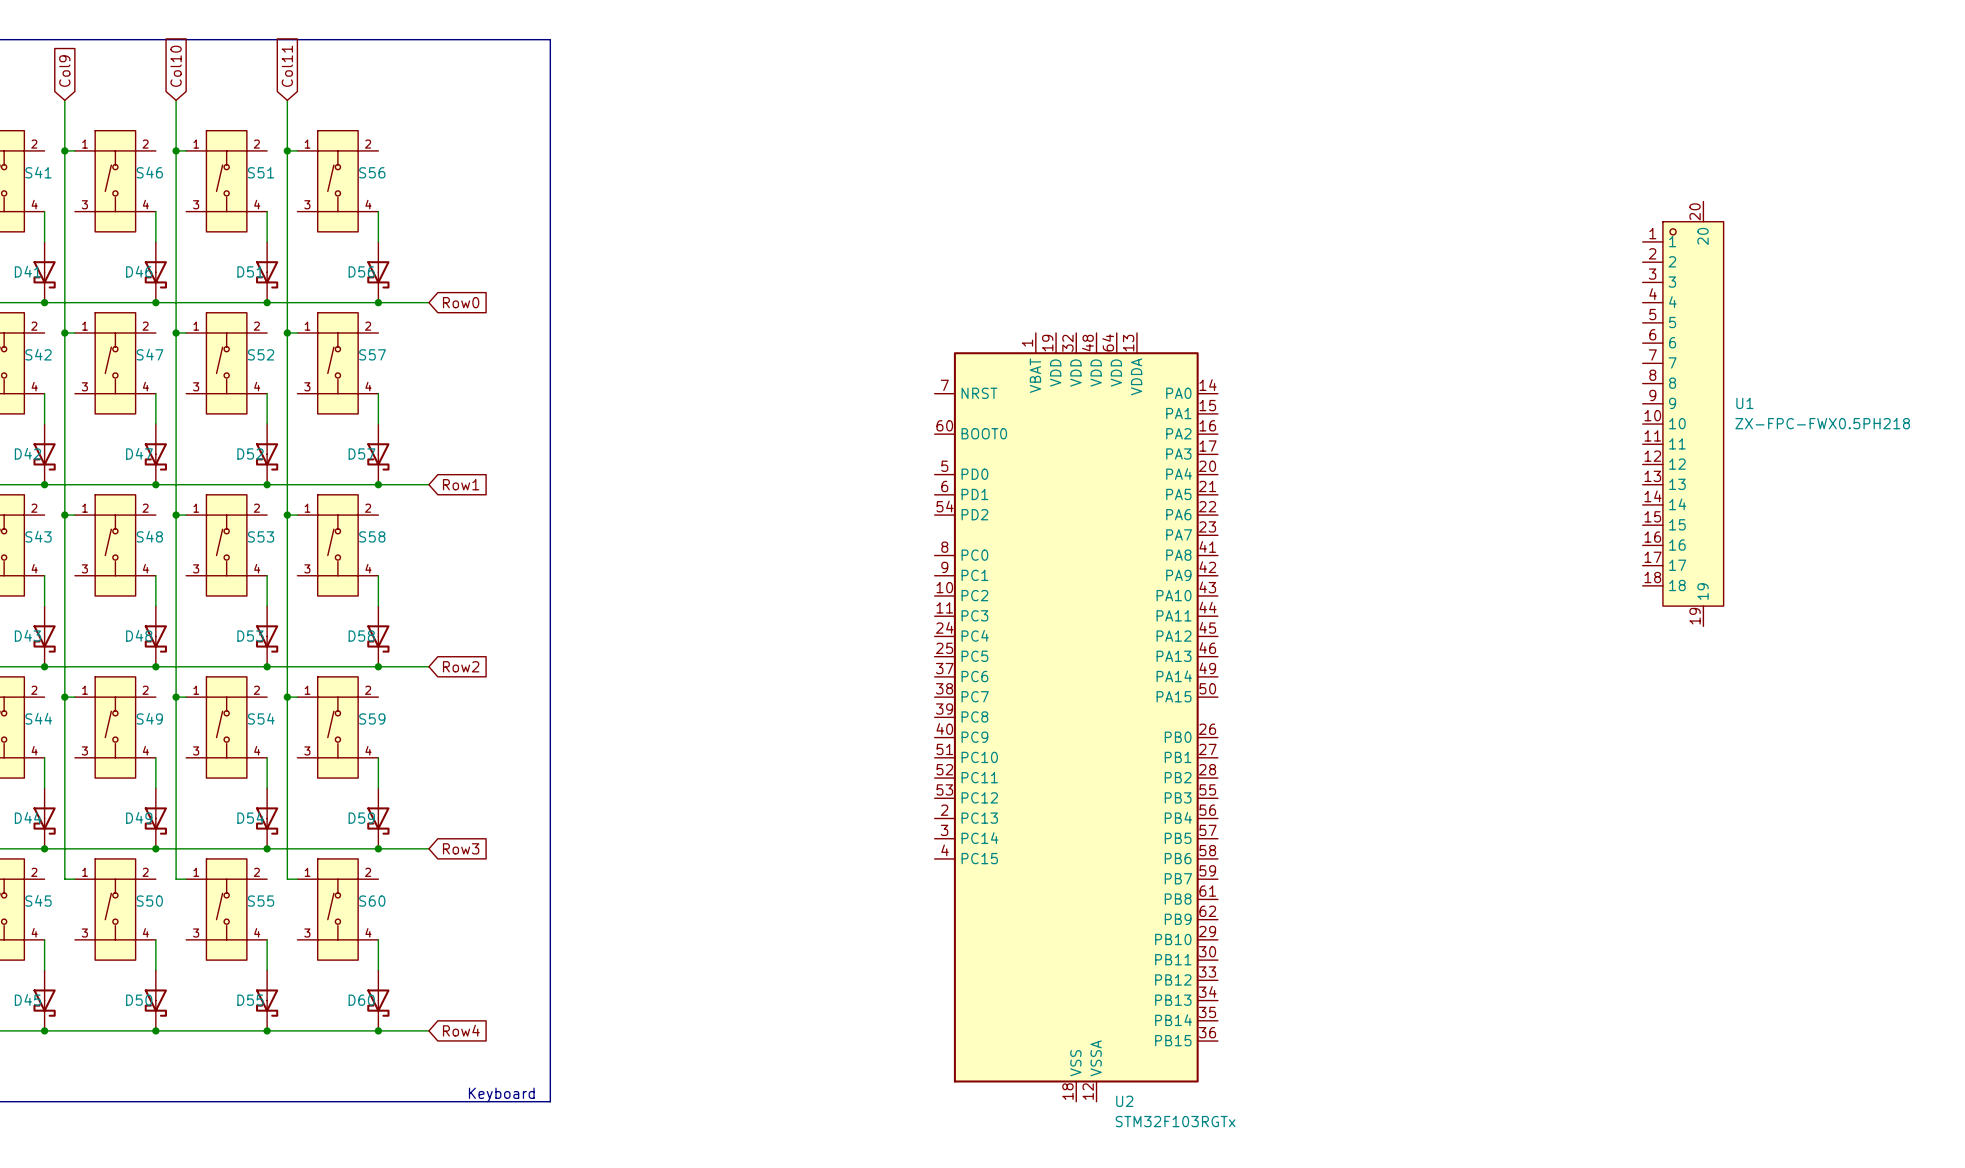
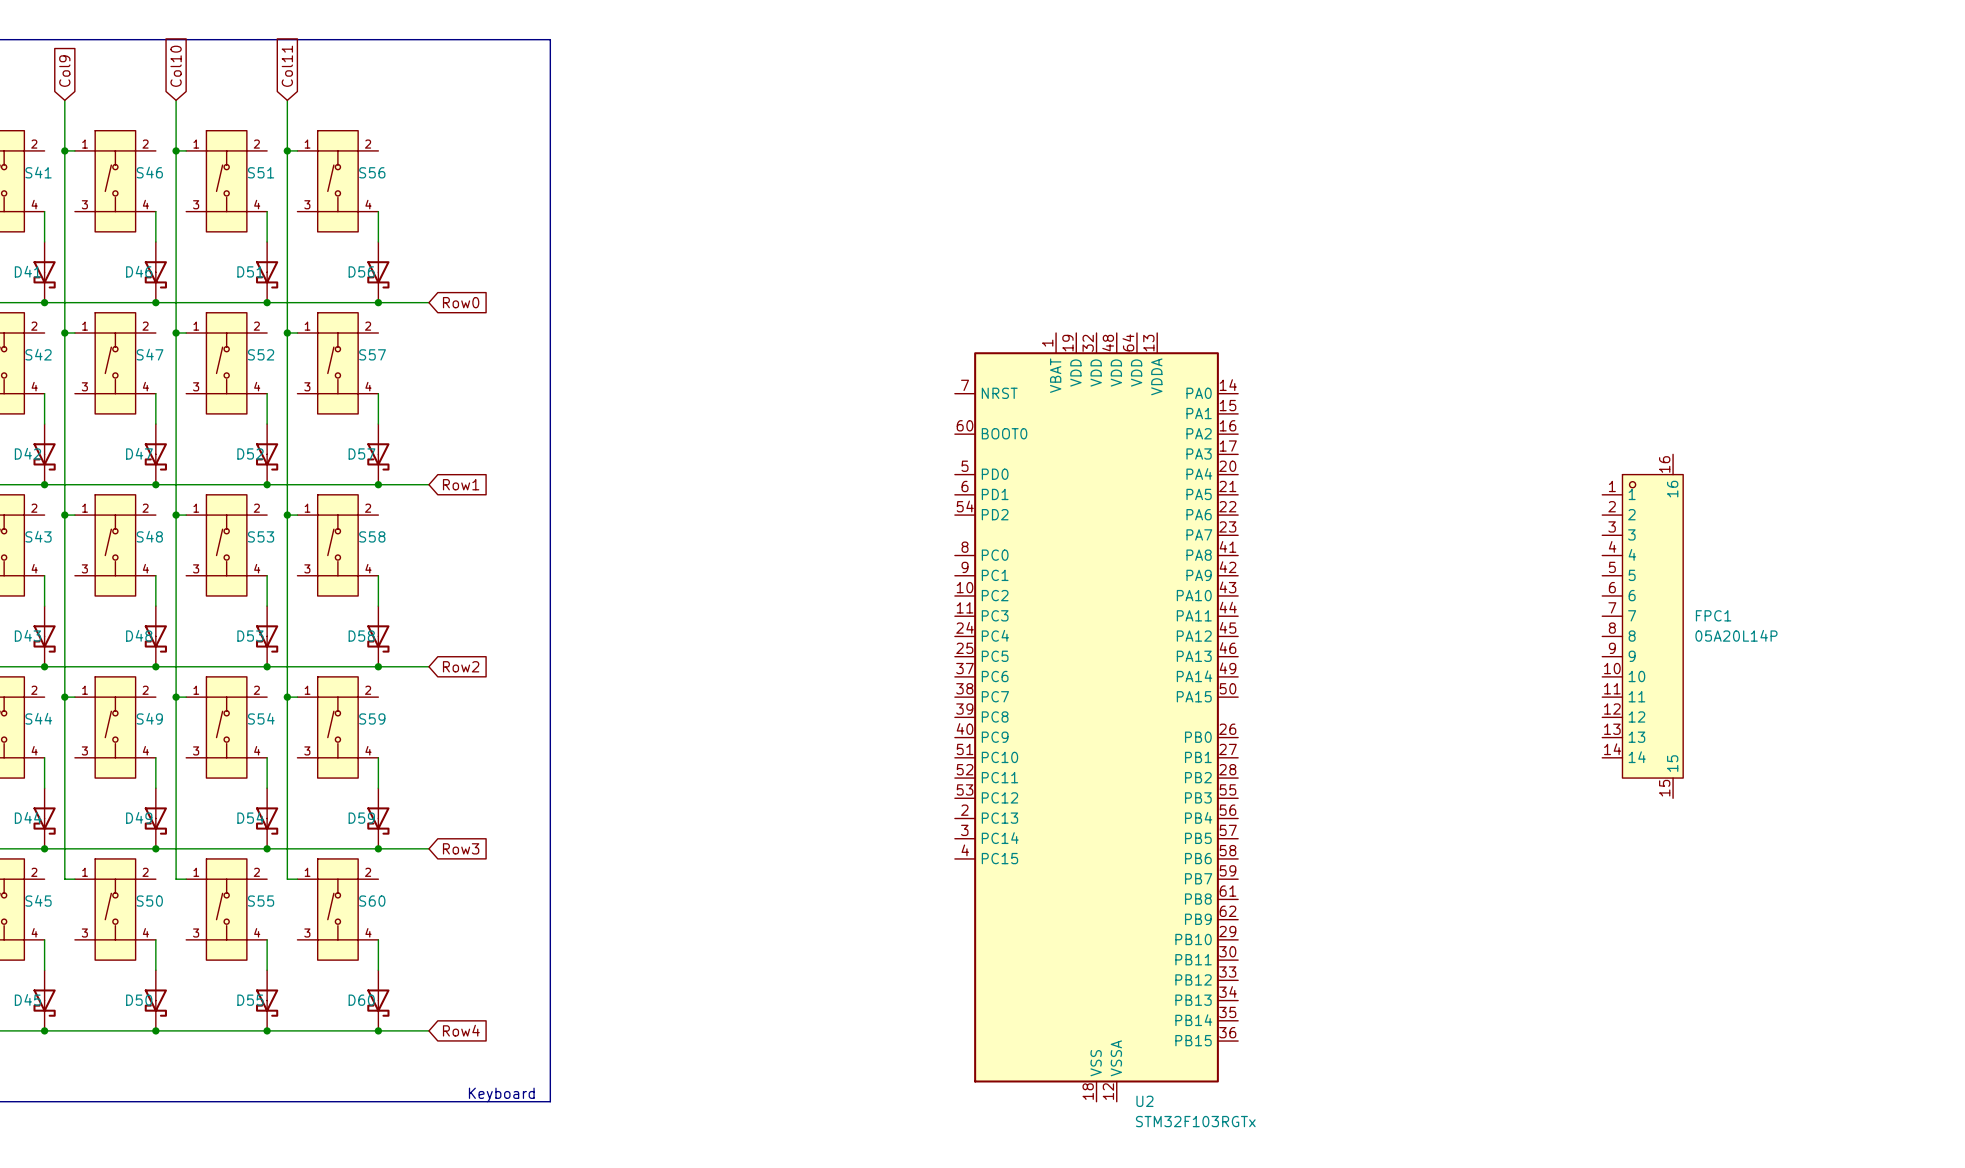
U1: ZX-FPC-FWX0.5PH218 (1683, 413) -> none
FPC1: none -> 05A20L14P (1642, 626)
U2 position: (1076, 717) -> (1096, 717)

